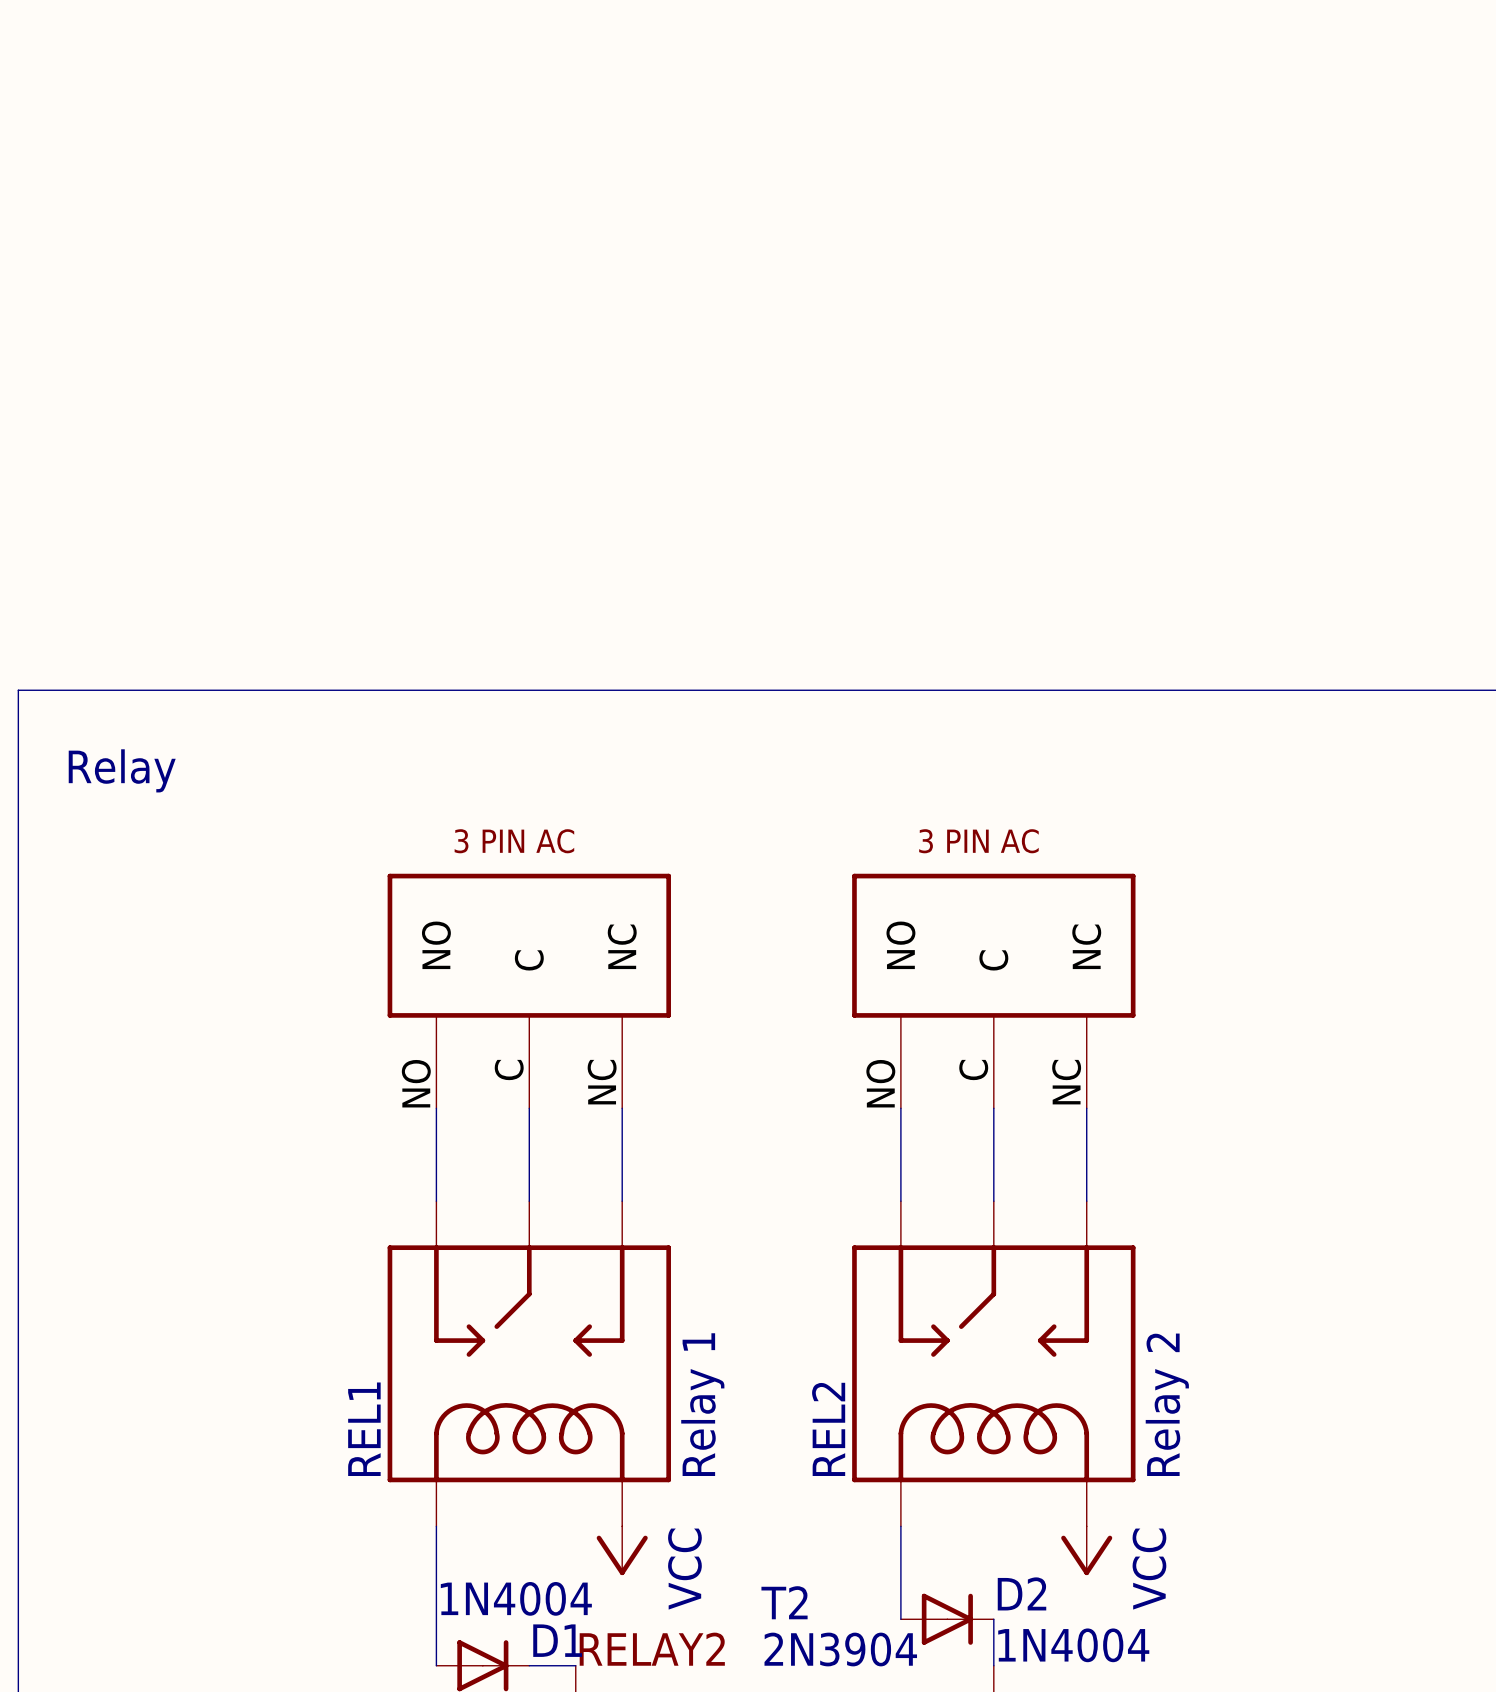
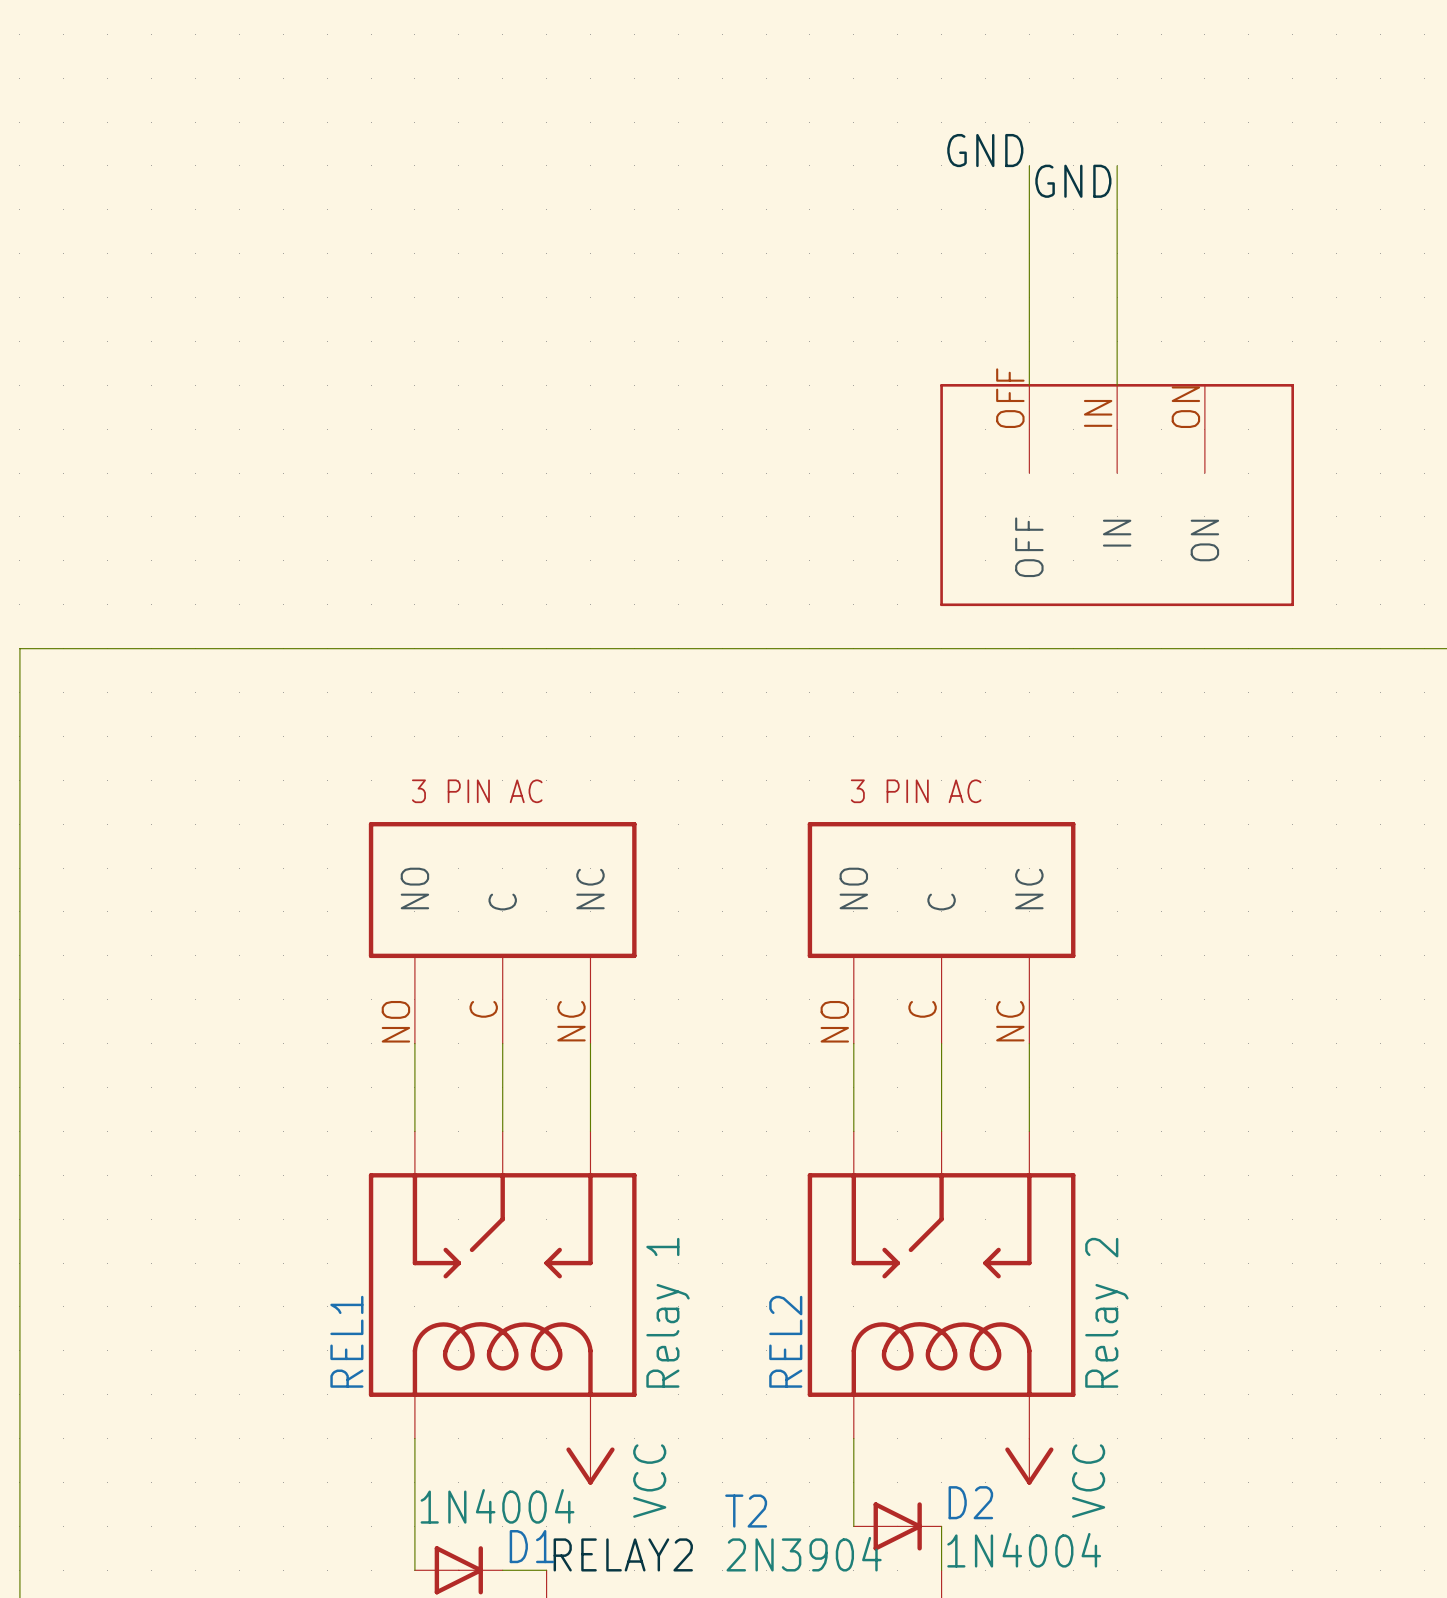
label: none -> GND (985, 150)
wire: none -> (1029, 165) (1029, 385)
wire: none -> (1117, 165) (1117, 385)
label: none -> GND (1073, 181)
part: none -> (1117, 495)
text: Relay (122, 770) -> none

